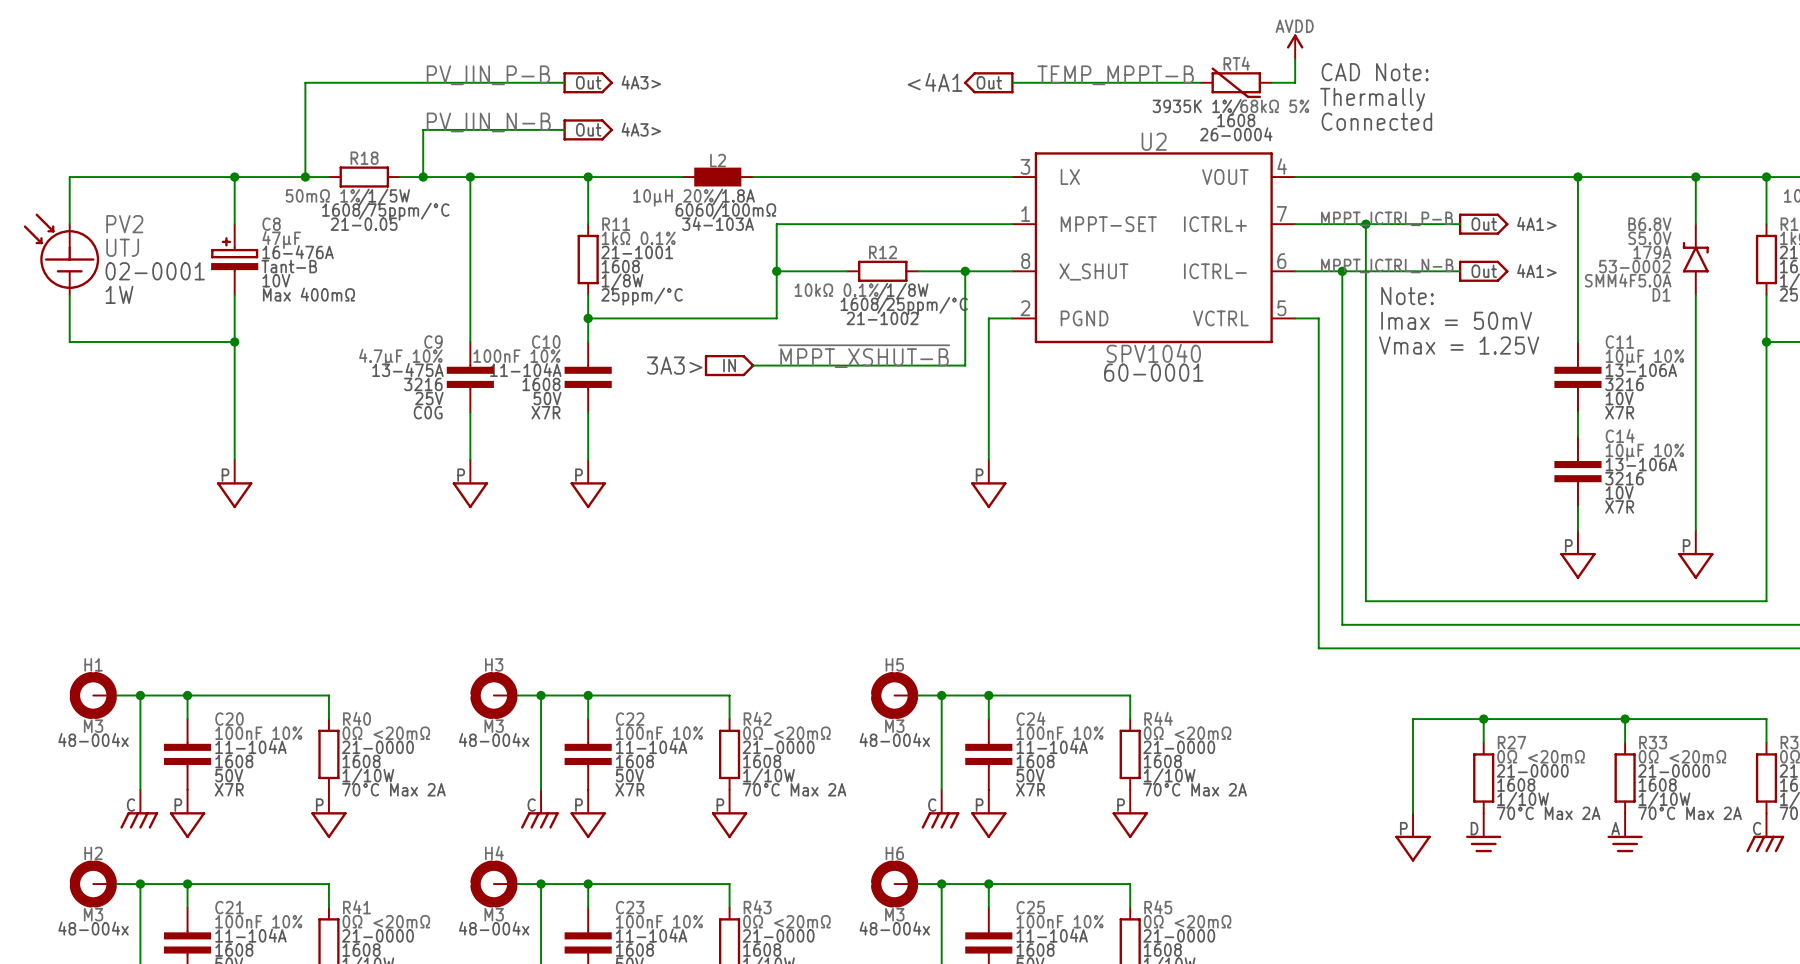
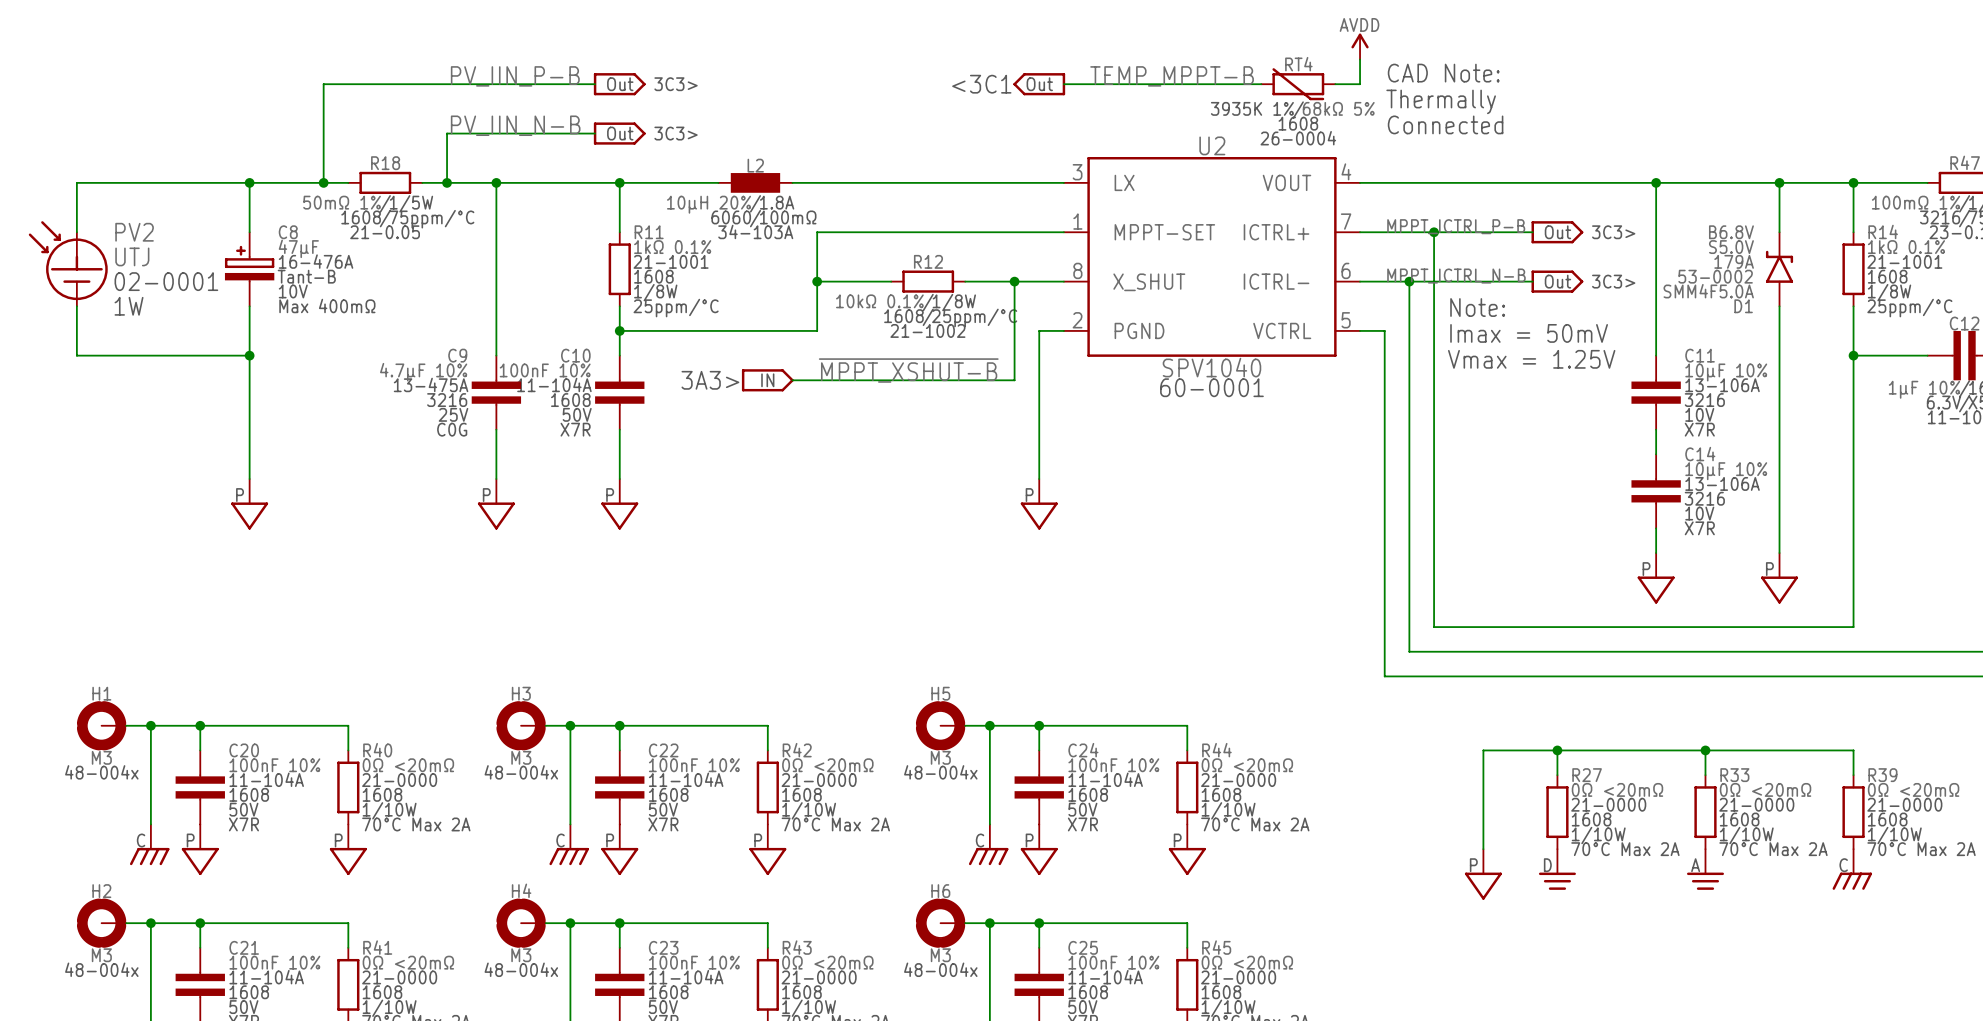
text: 4A3> (641, 82) -> 3C3> (676, 84)
text: <4A1 (935, 82) -> <3C1 (981, 84)
text: 4A3> (641, 129) -> 3C3> (676, 133)
text: 4A1> (1536, 223) -> 3C3> (1613, 232)
text: 4A1> (1536, 271) -> 3C3> (1613, 281)

